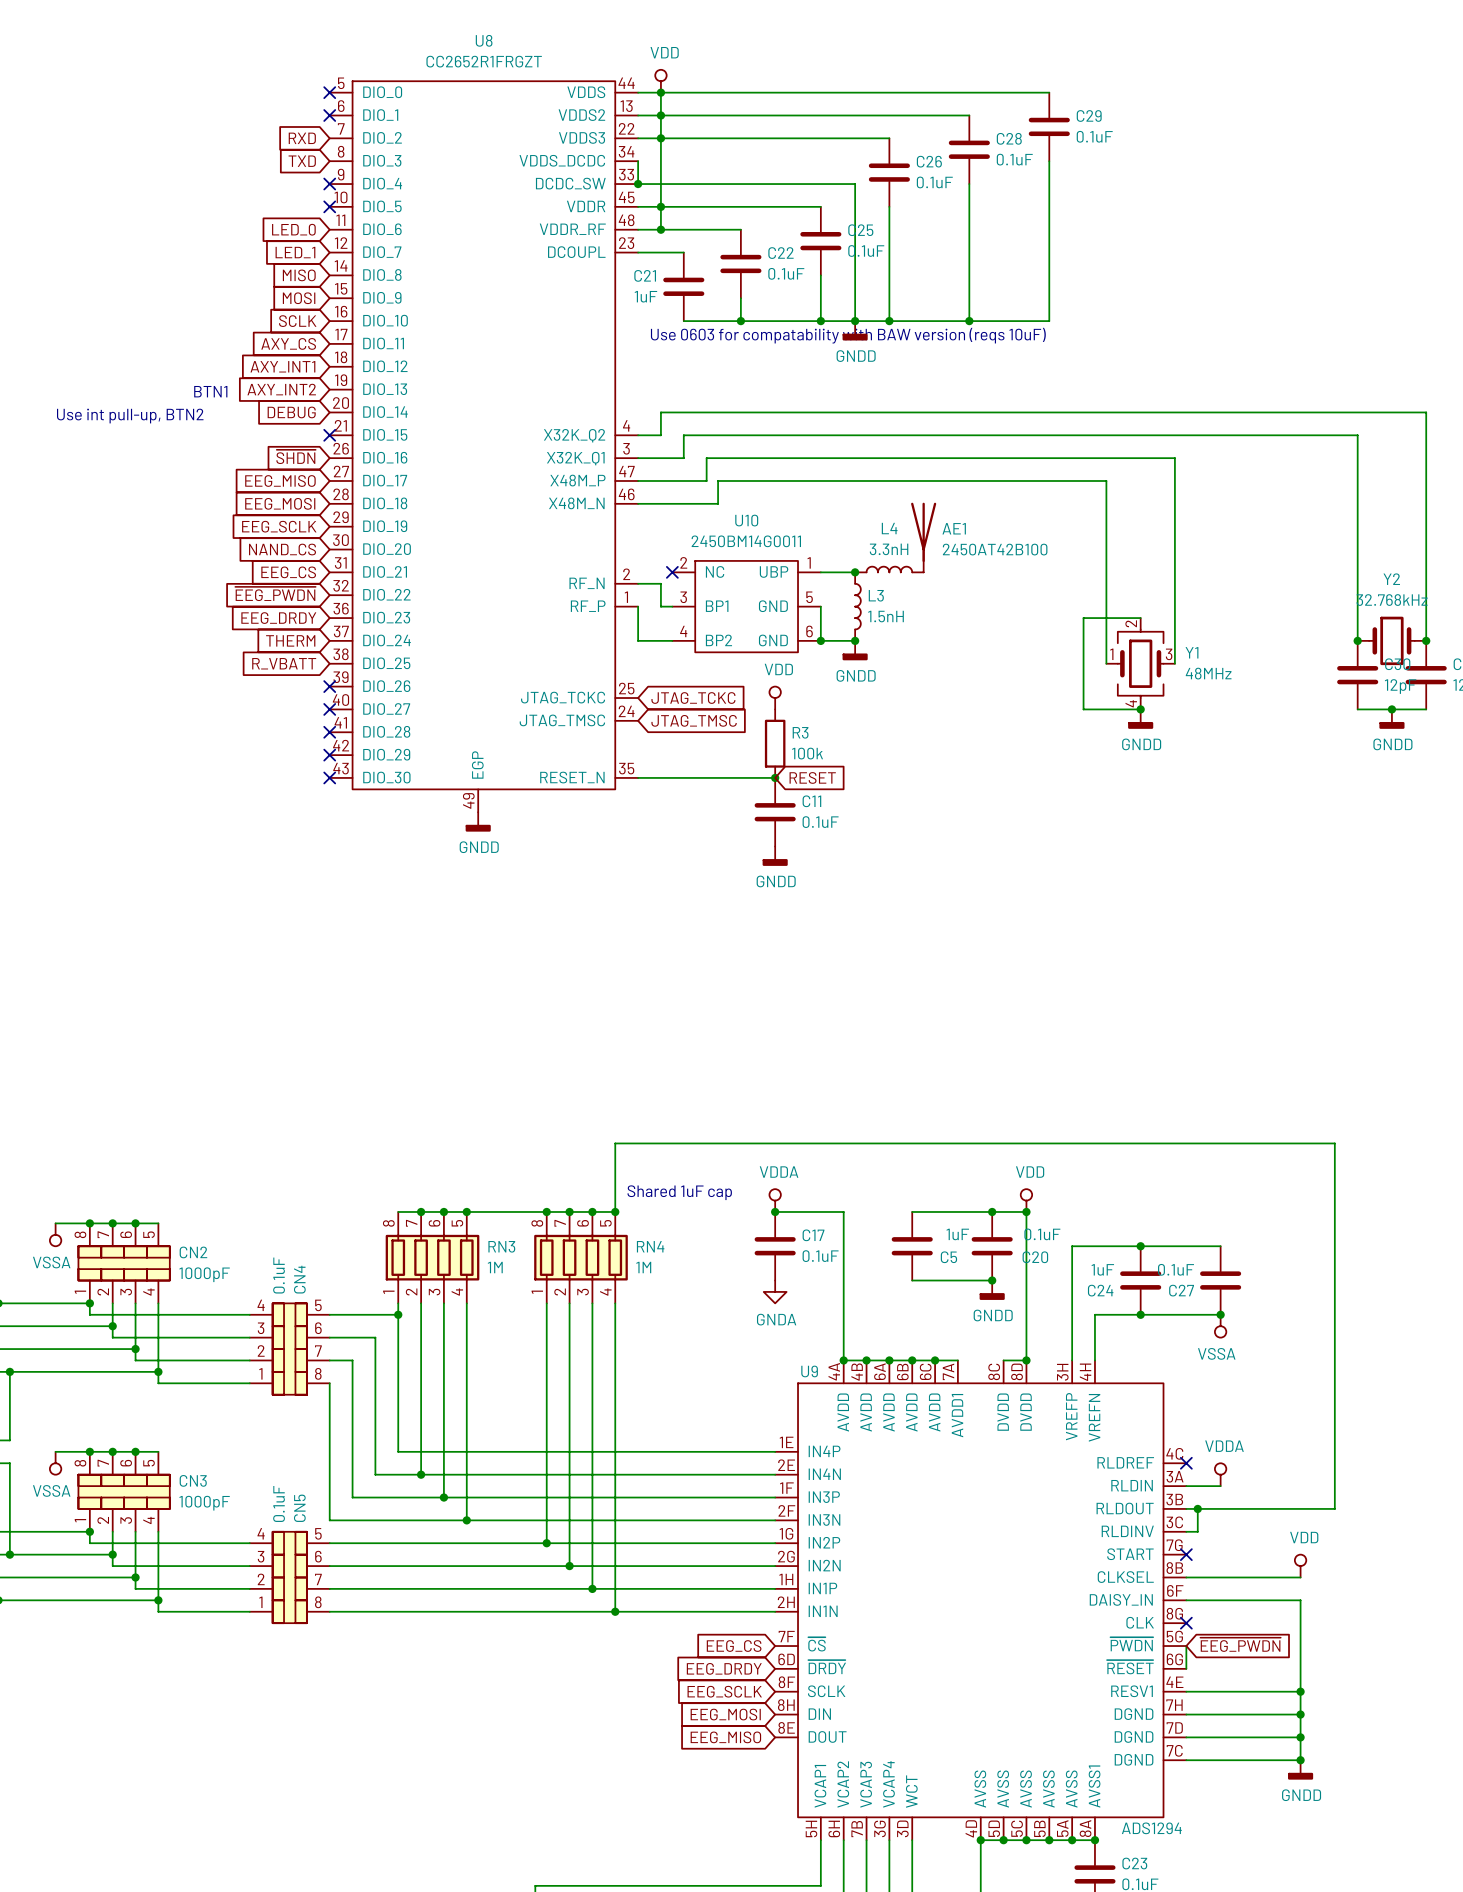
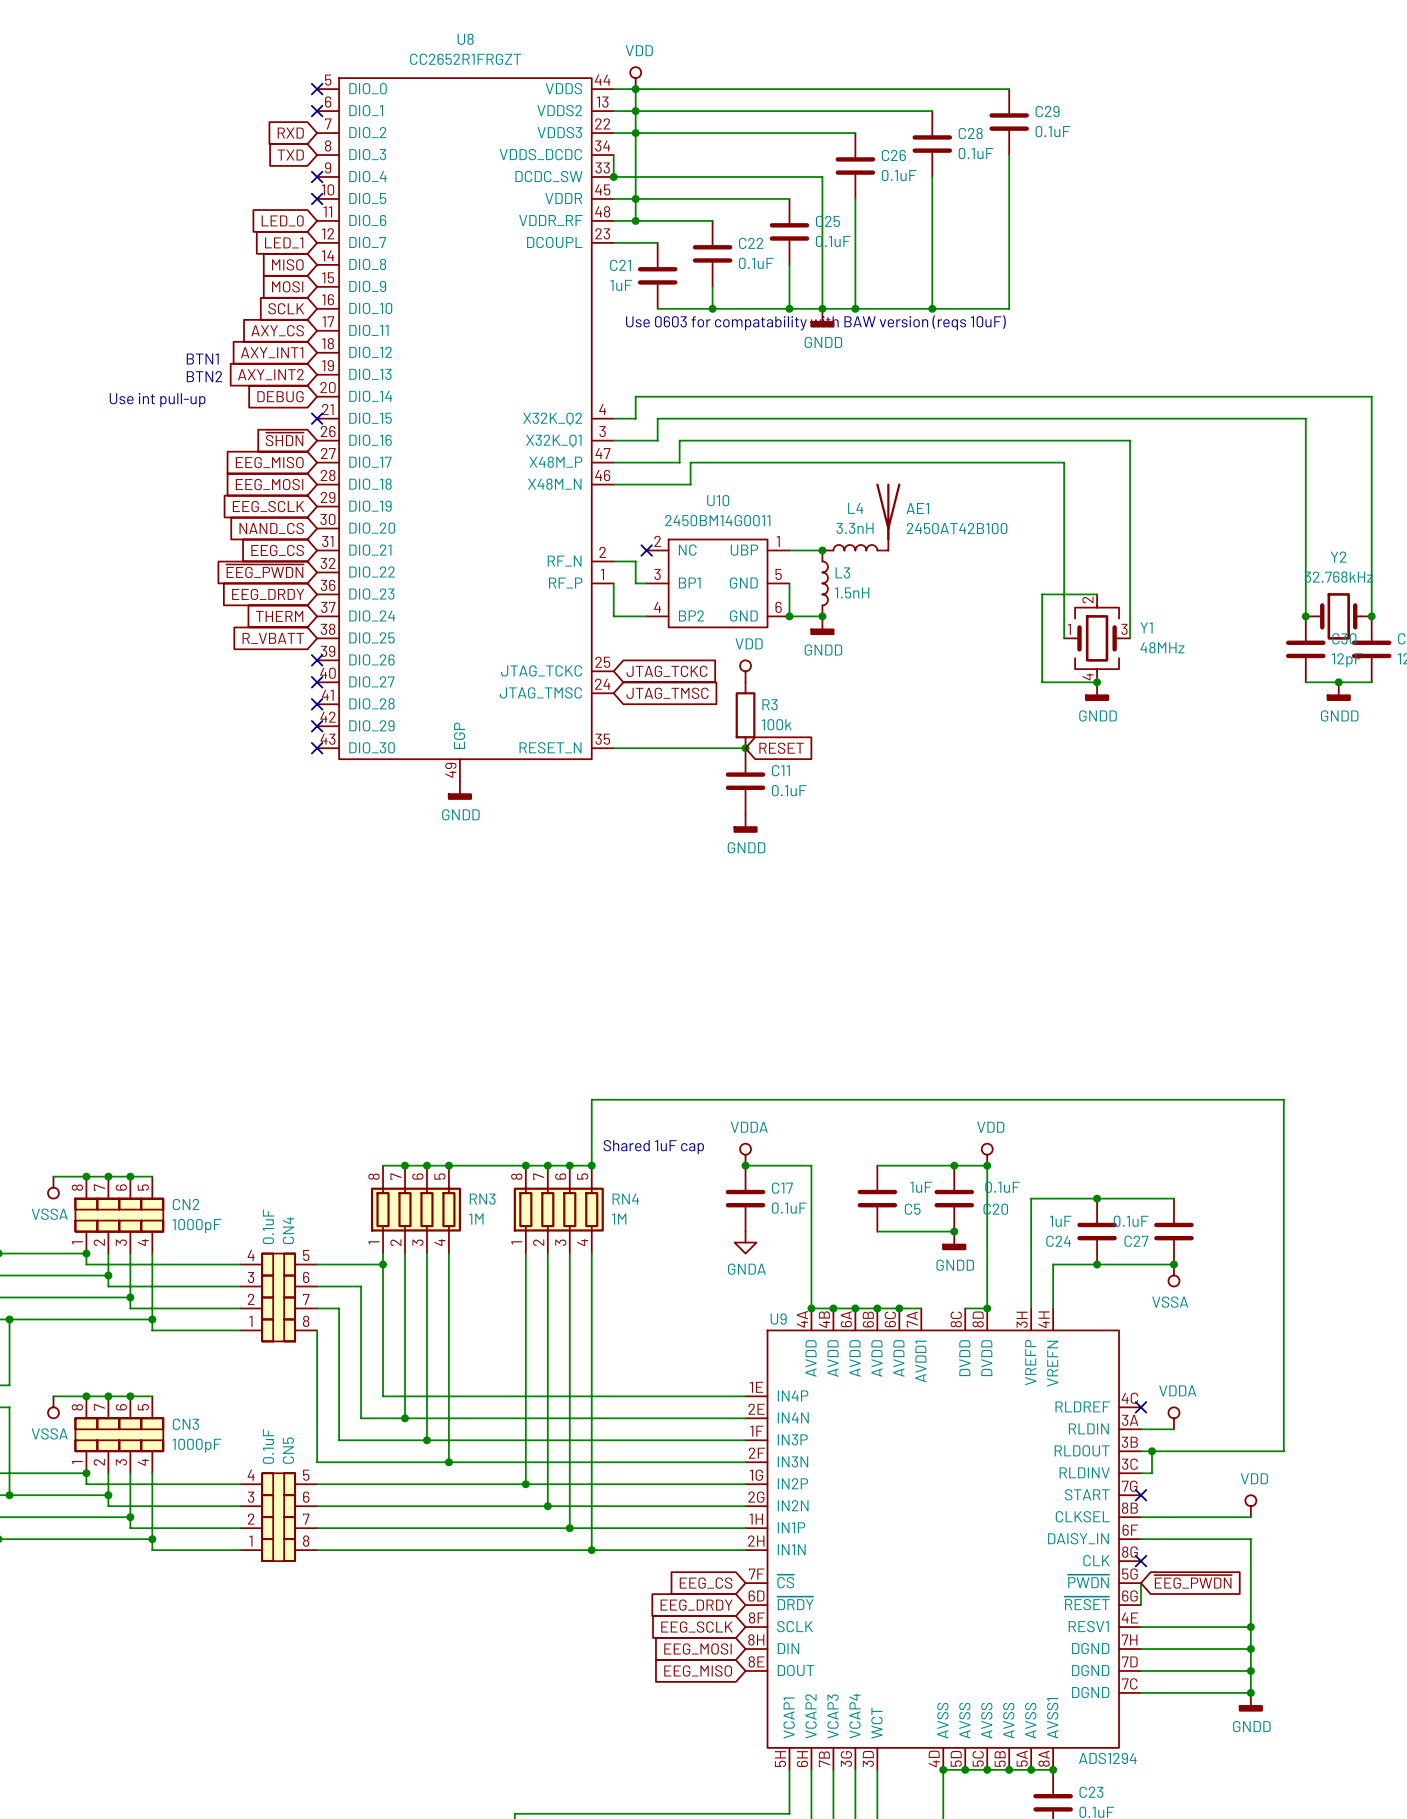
text: none -> BTN1 (202, 359)
text: BTN1 (210, 391) -> BTN2 (204, 376)
text: Use int pull-up, BTN2 (130, 416) -> Use int pull-up (157, 400)

